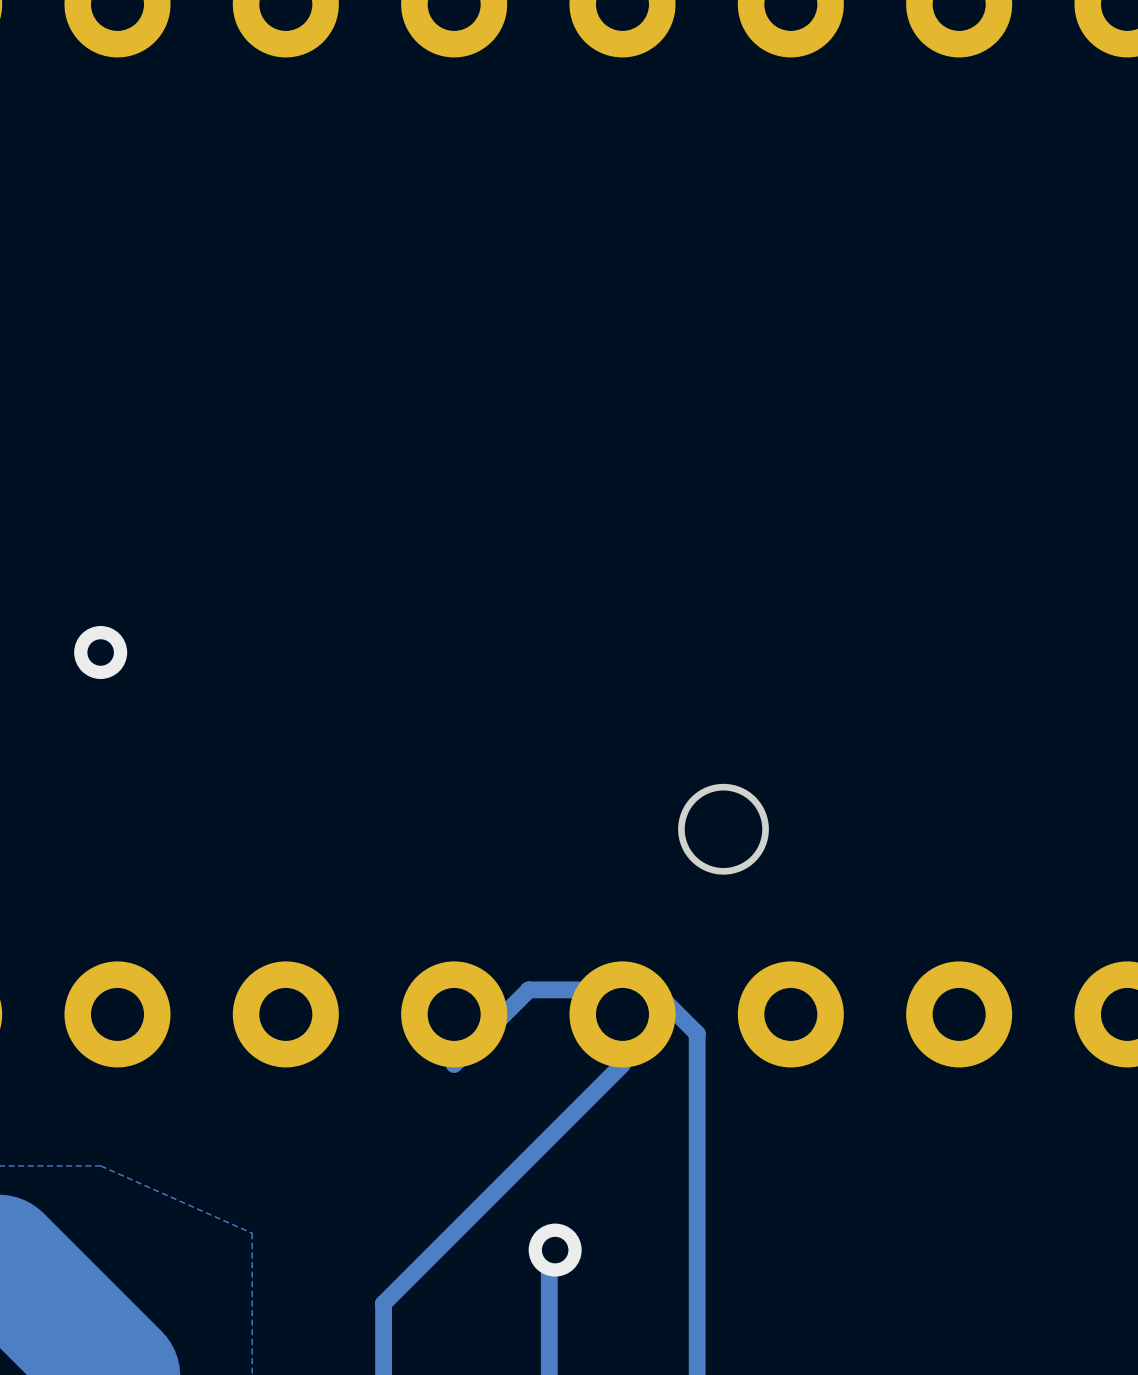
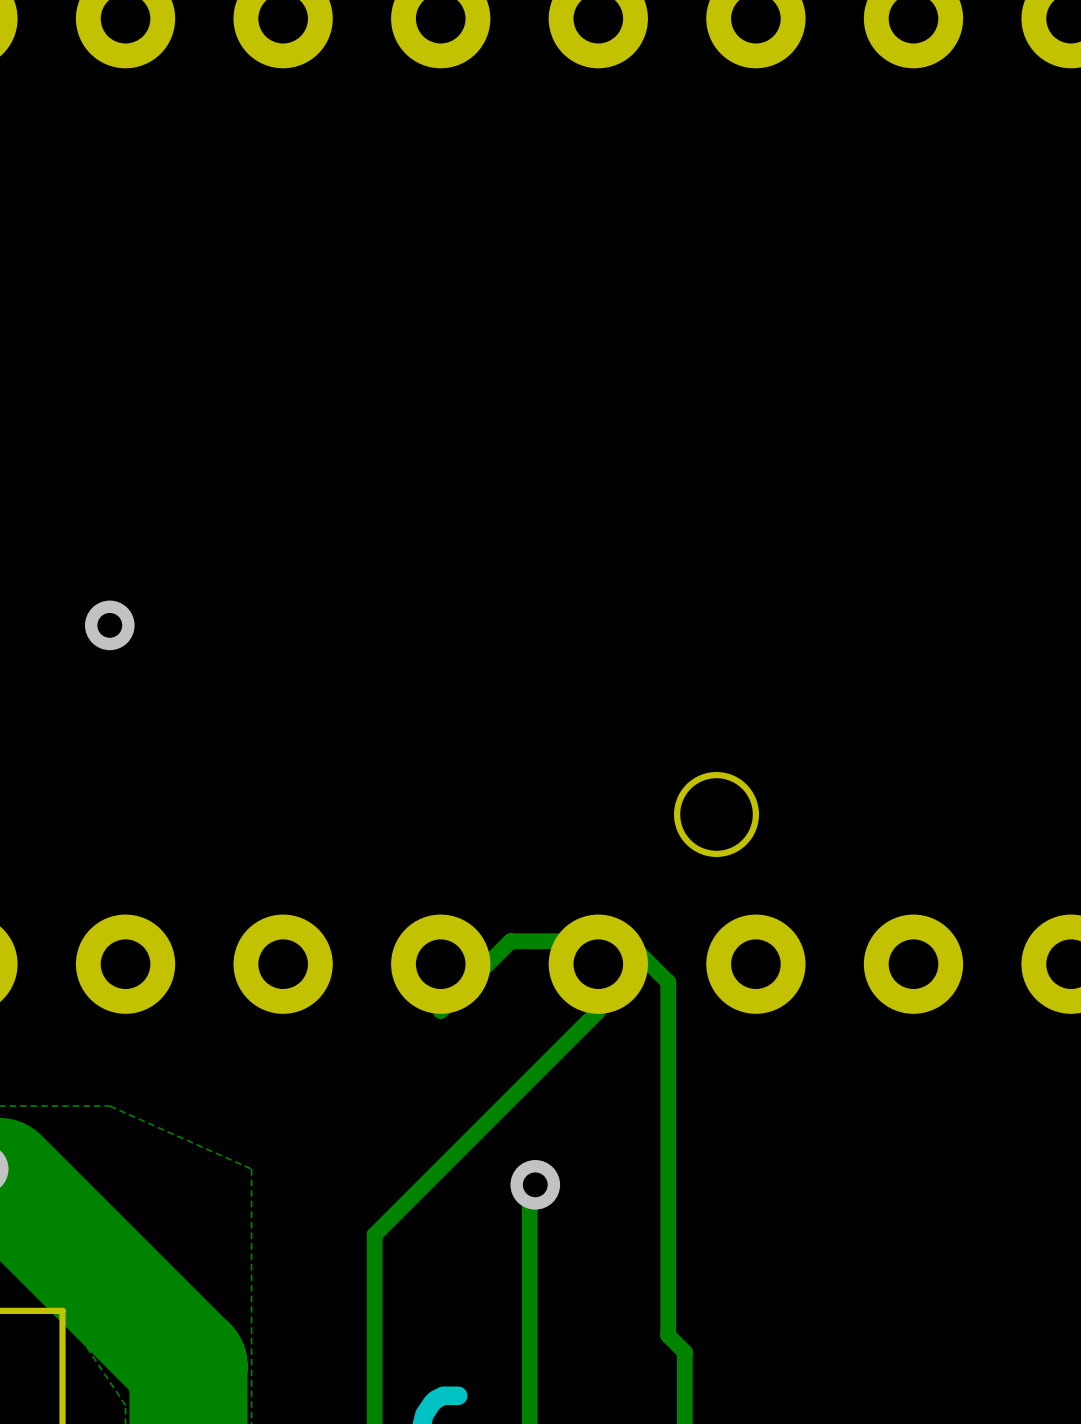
round board edge position: (723, 829) -> (716, 814)

